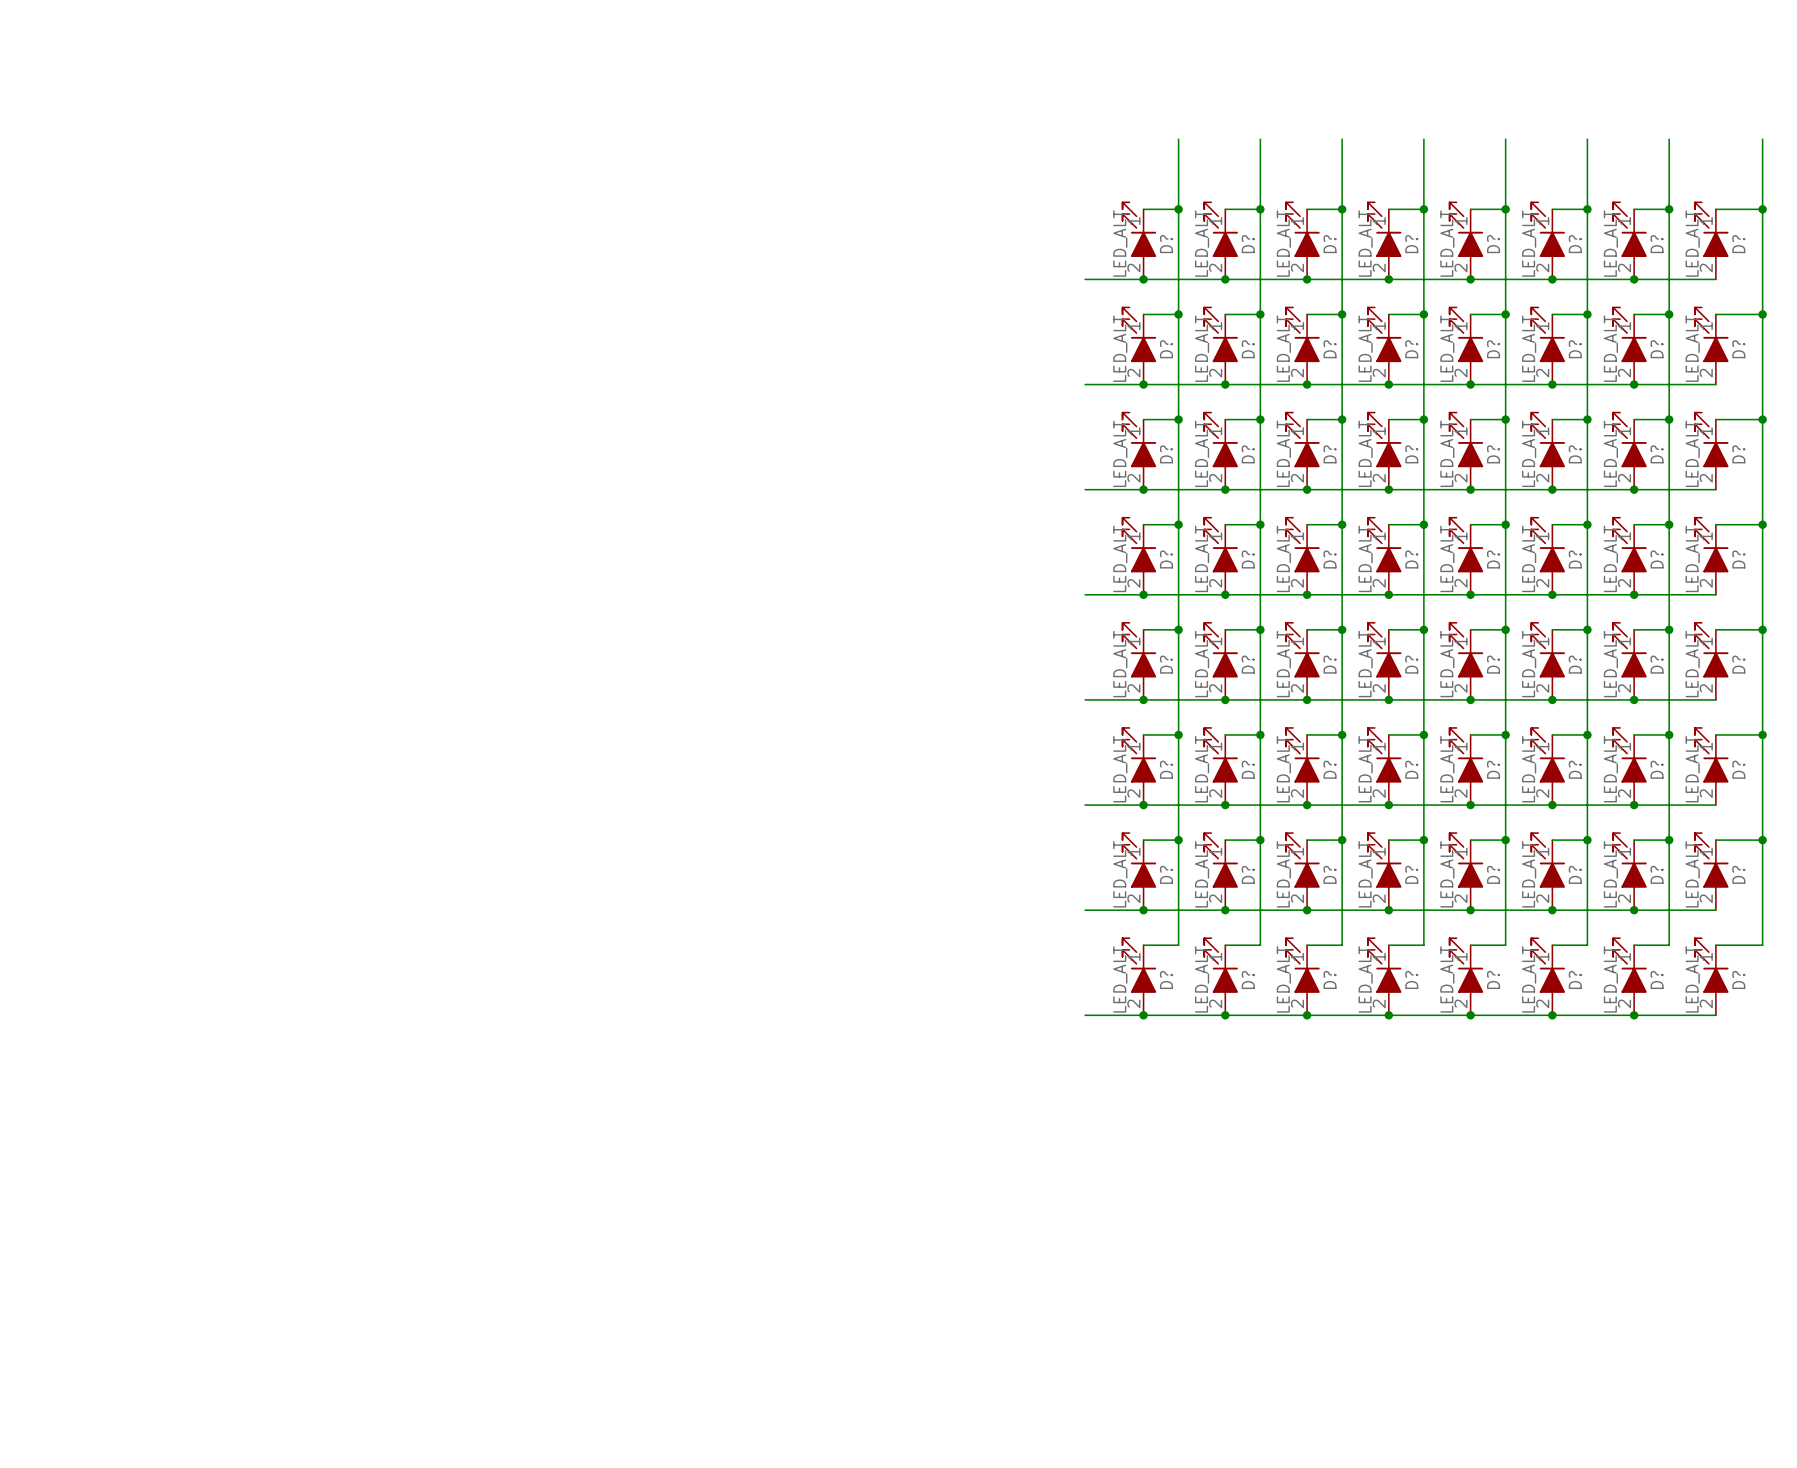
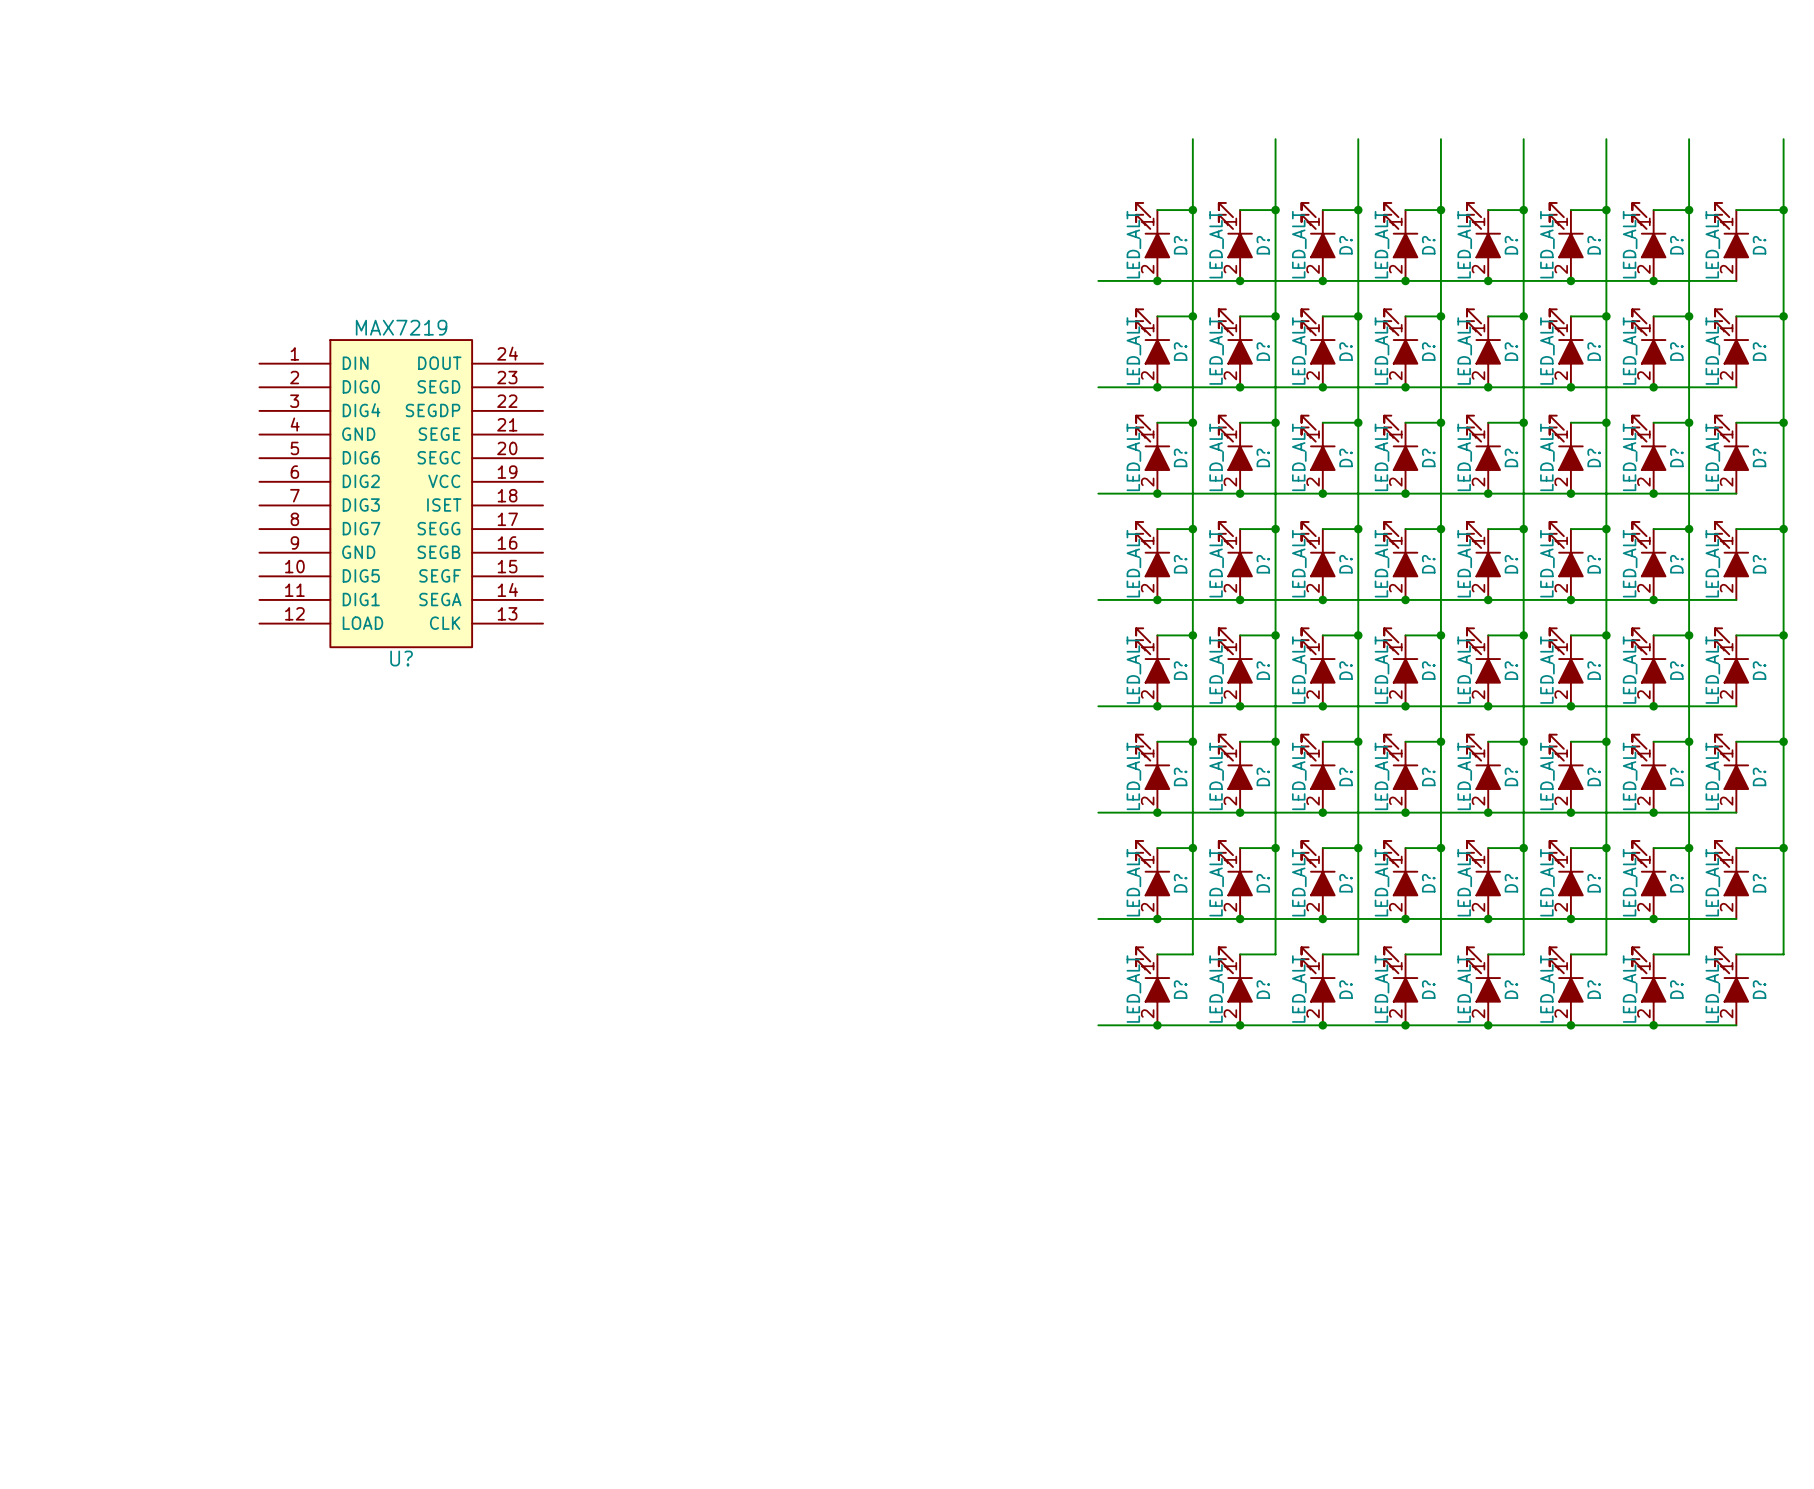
U?: none -> MAX7219 (401, 493)

